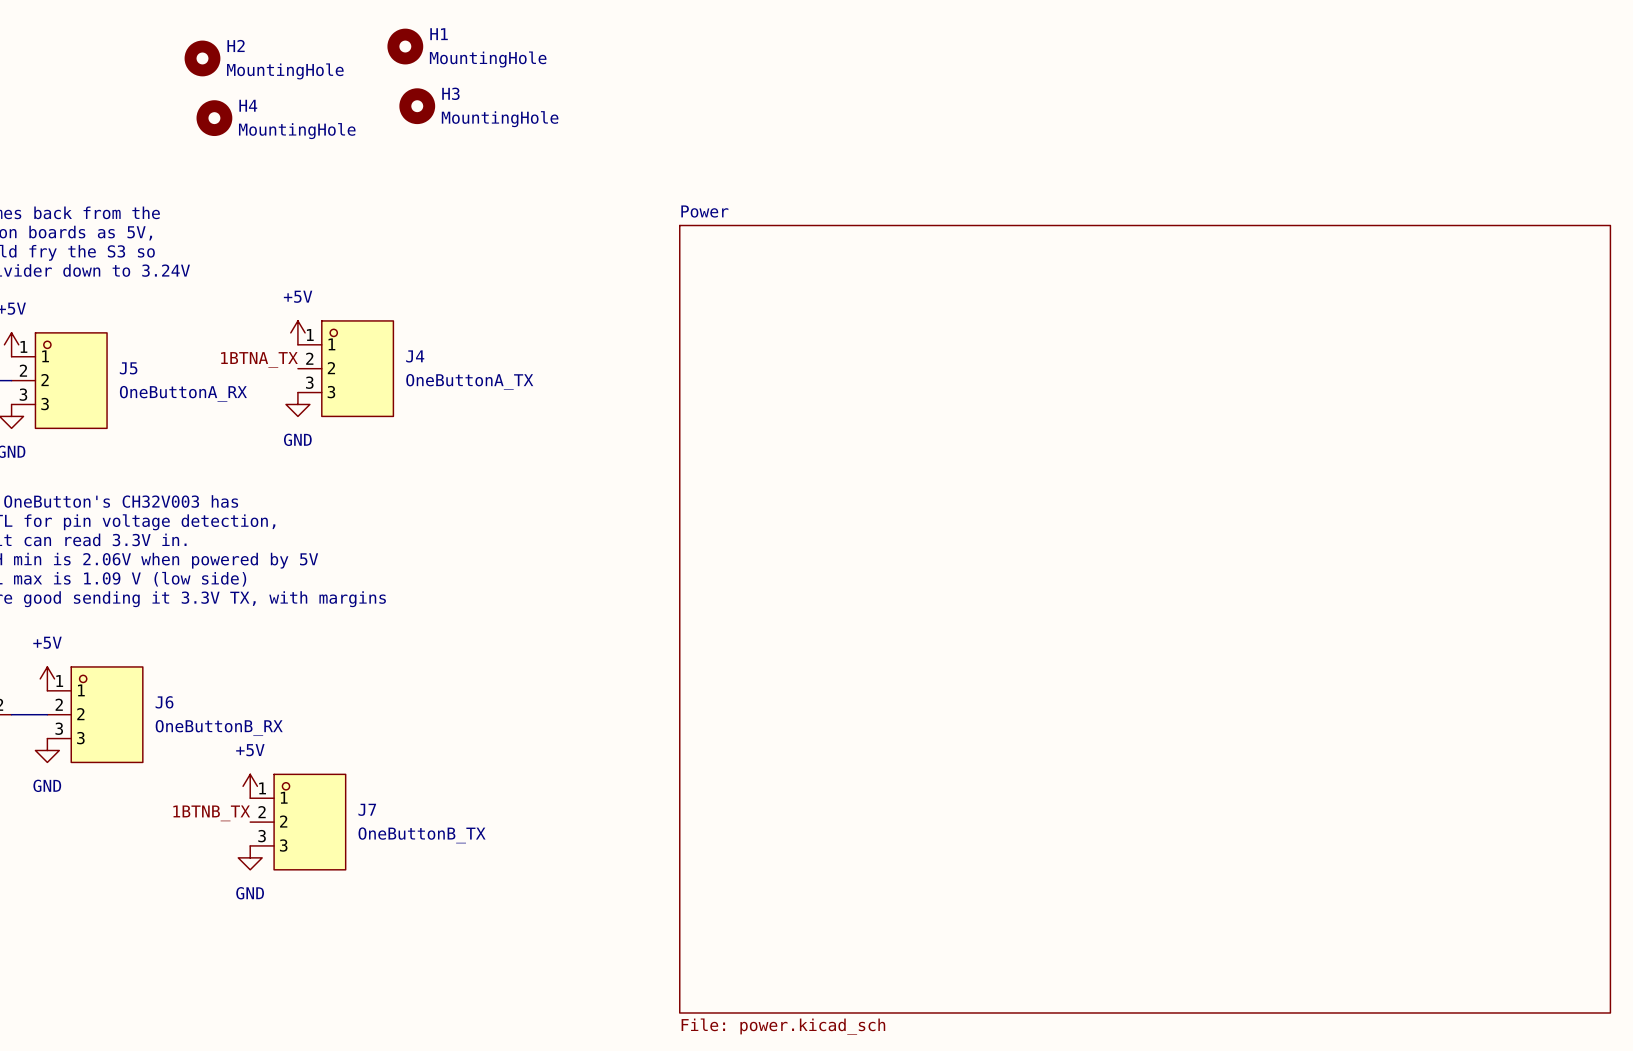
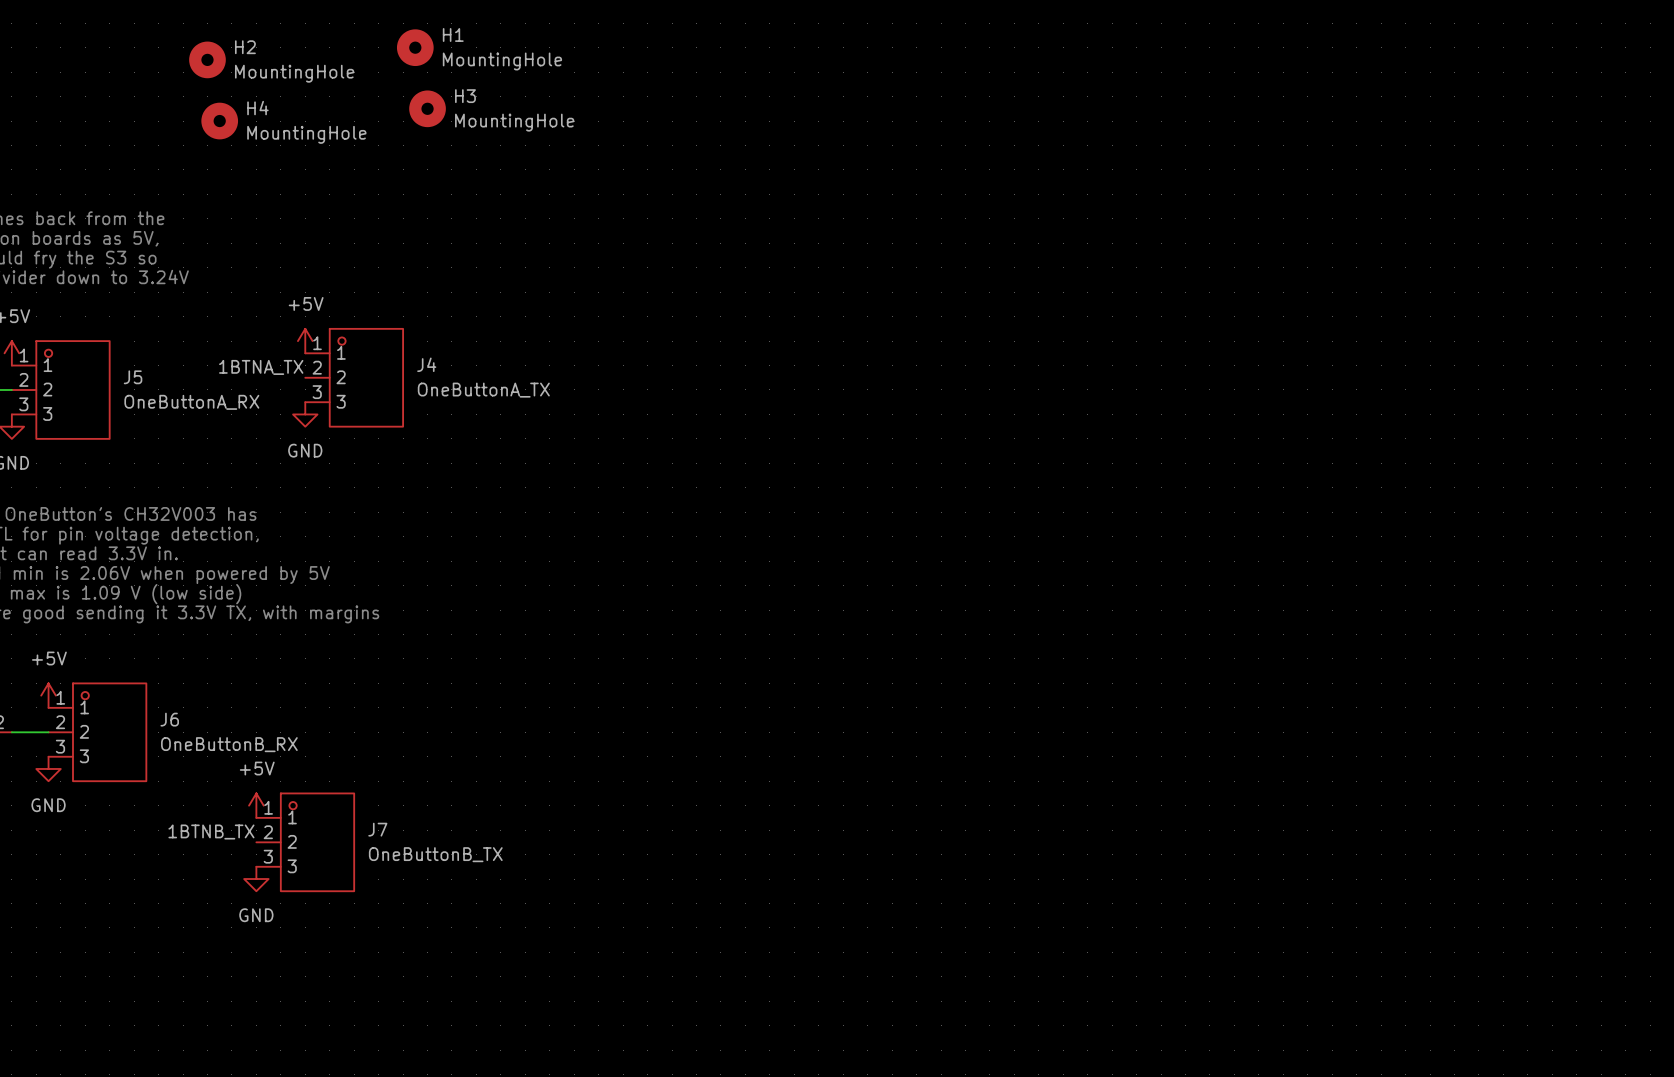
sheet Power: File: power.kicad_sch (1145, 619) -> none

